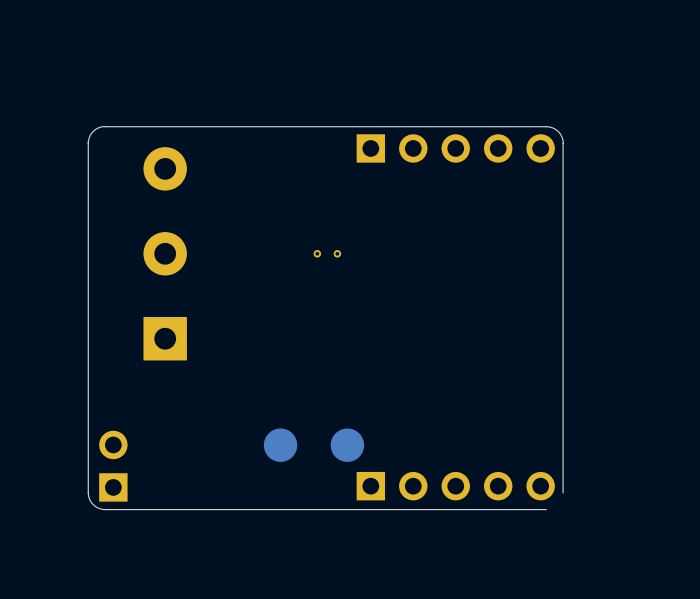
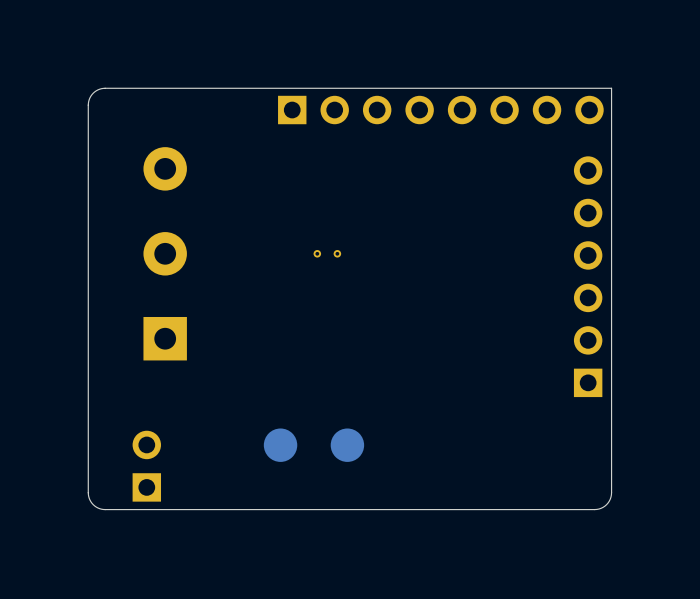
board edge: none -> (105, 88) (611, 88) (611, 492)
board edge: none -> (88, 105) (88, 141)
part: none -> (440, 110)
board edge: (105, 126) (93, 131) (88, 143) -> (105, 88) (93, 93) (88, 105)
board edge: (105, 126) (546, 126) (558, 131) (563, 143) -> none
board edge: (563, 143) (563, 492) -> none
part: (455, 148) -> none
part: none -> (588, 276)
part position: (113, 466) -> (146, 466)
part: (455, 486) -> none
board edge: none -> (611, 492) (606, 504) (594, 509)
board edge: none -> (594, 509) (546, 509)

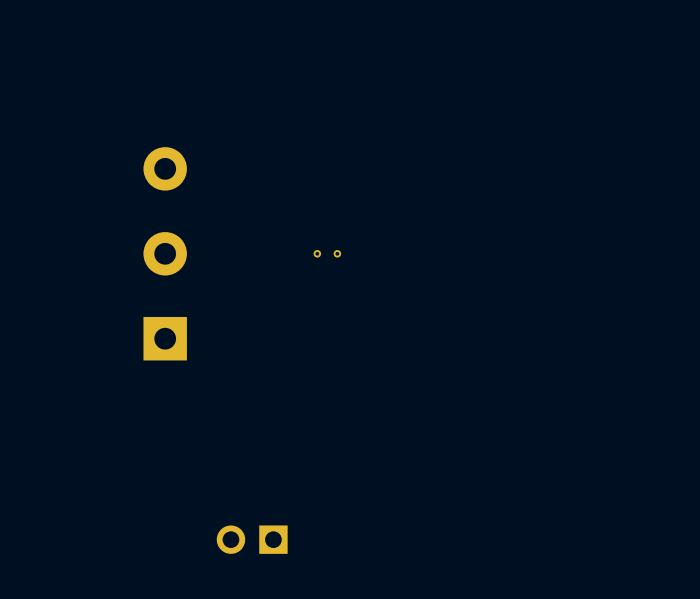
board edge: (105, 88) (93, 93) (88, 105) -> none
board edge: (105, 88) (611, 88) (611, 492) -> none
board edge: (88, 105) (88, 492) -> none
part: (440, 110) -> none
part: (588, 276) -> none
part: (313, 445) -> none
part rotation: 0° (146, 466) -> 90° counterclockwise (252, 539)
part position: (146, 466) -> (252, 539)
board edge: (88, 492) (93, 504) (105, 509) -> none
board edge: (611, 492) (606, 504) (594, 509) -> none
board edge: (594, 509) (105, 509) -> none

